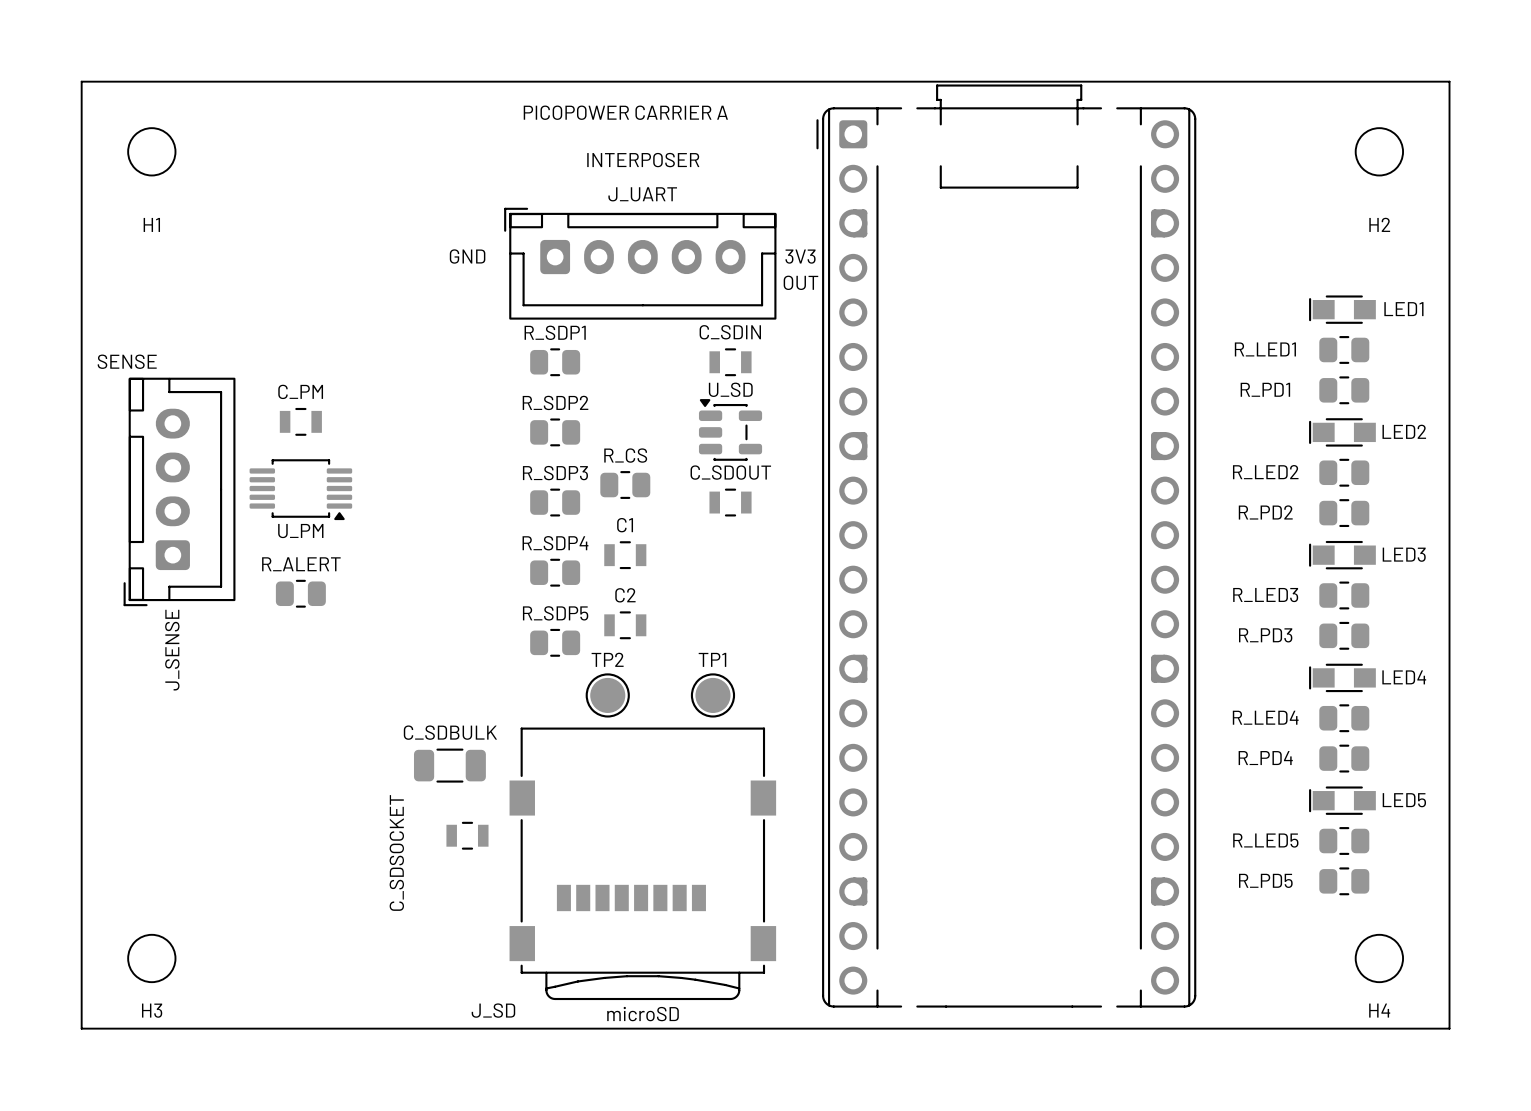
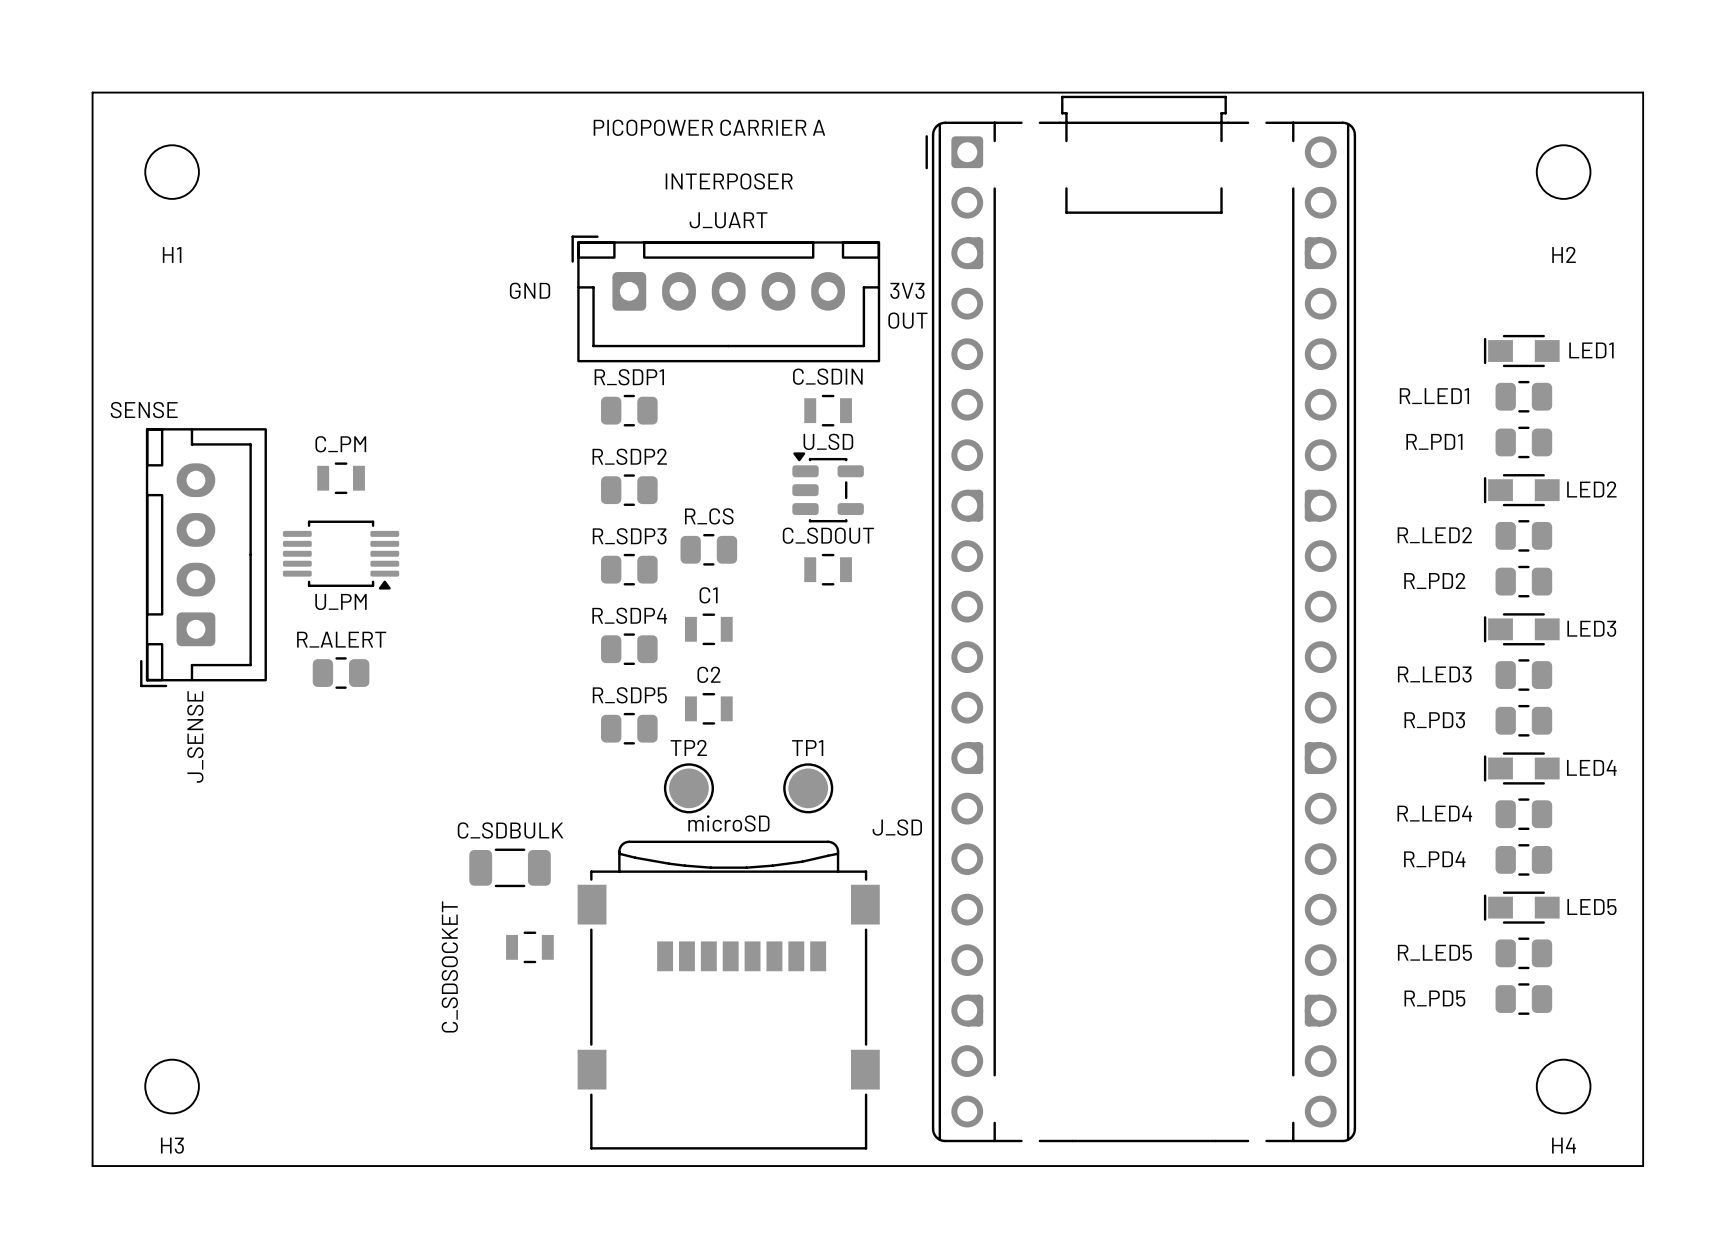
J_SD rotation: 0° (642, 863) -> 180° (728, 995)
text position: microSD (643, 1014) -> microSD (728, 823)

